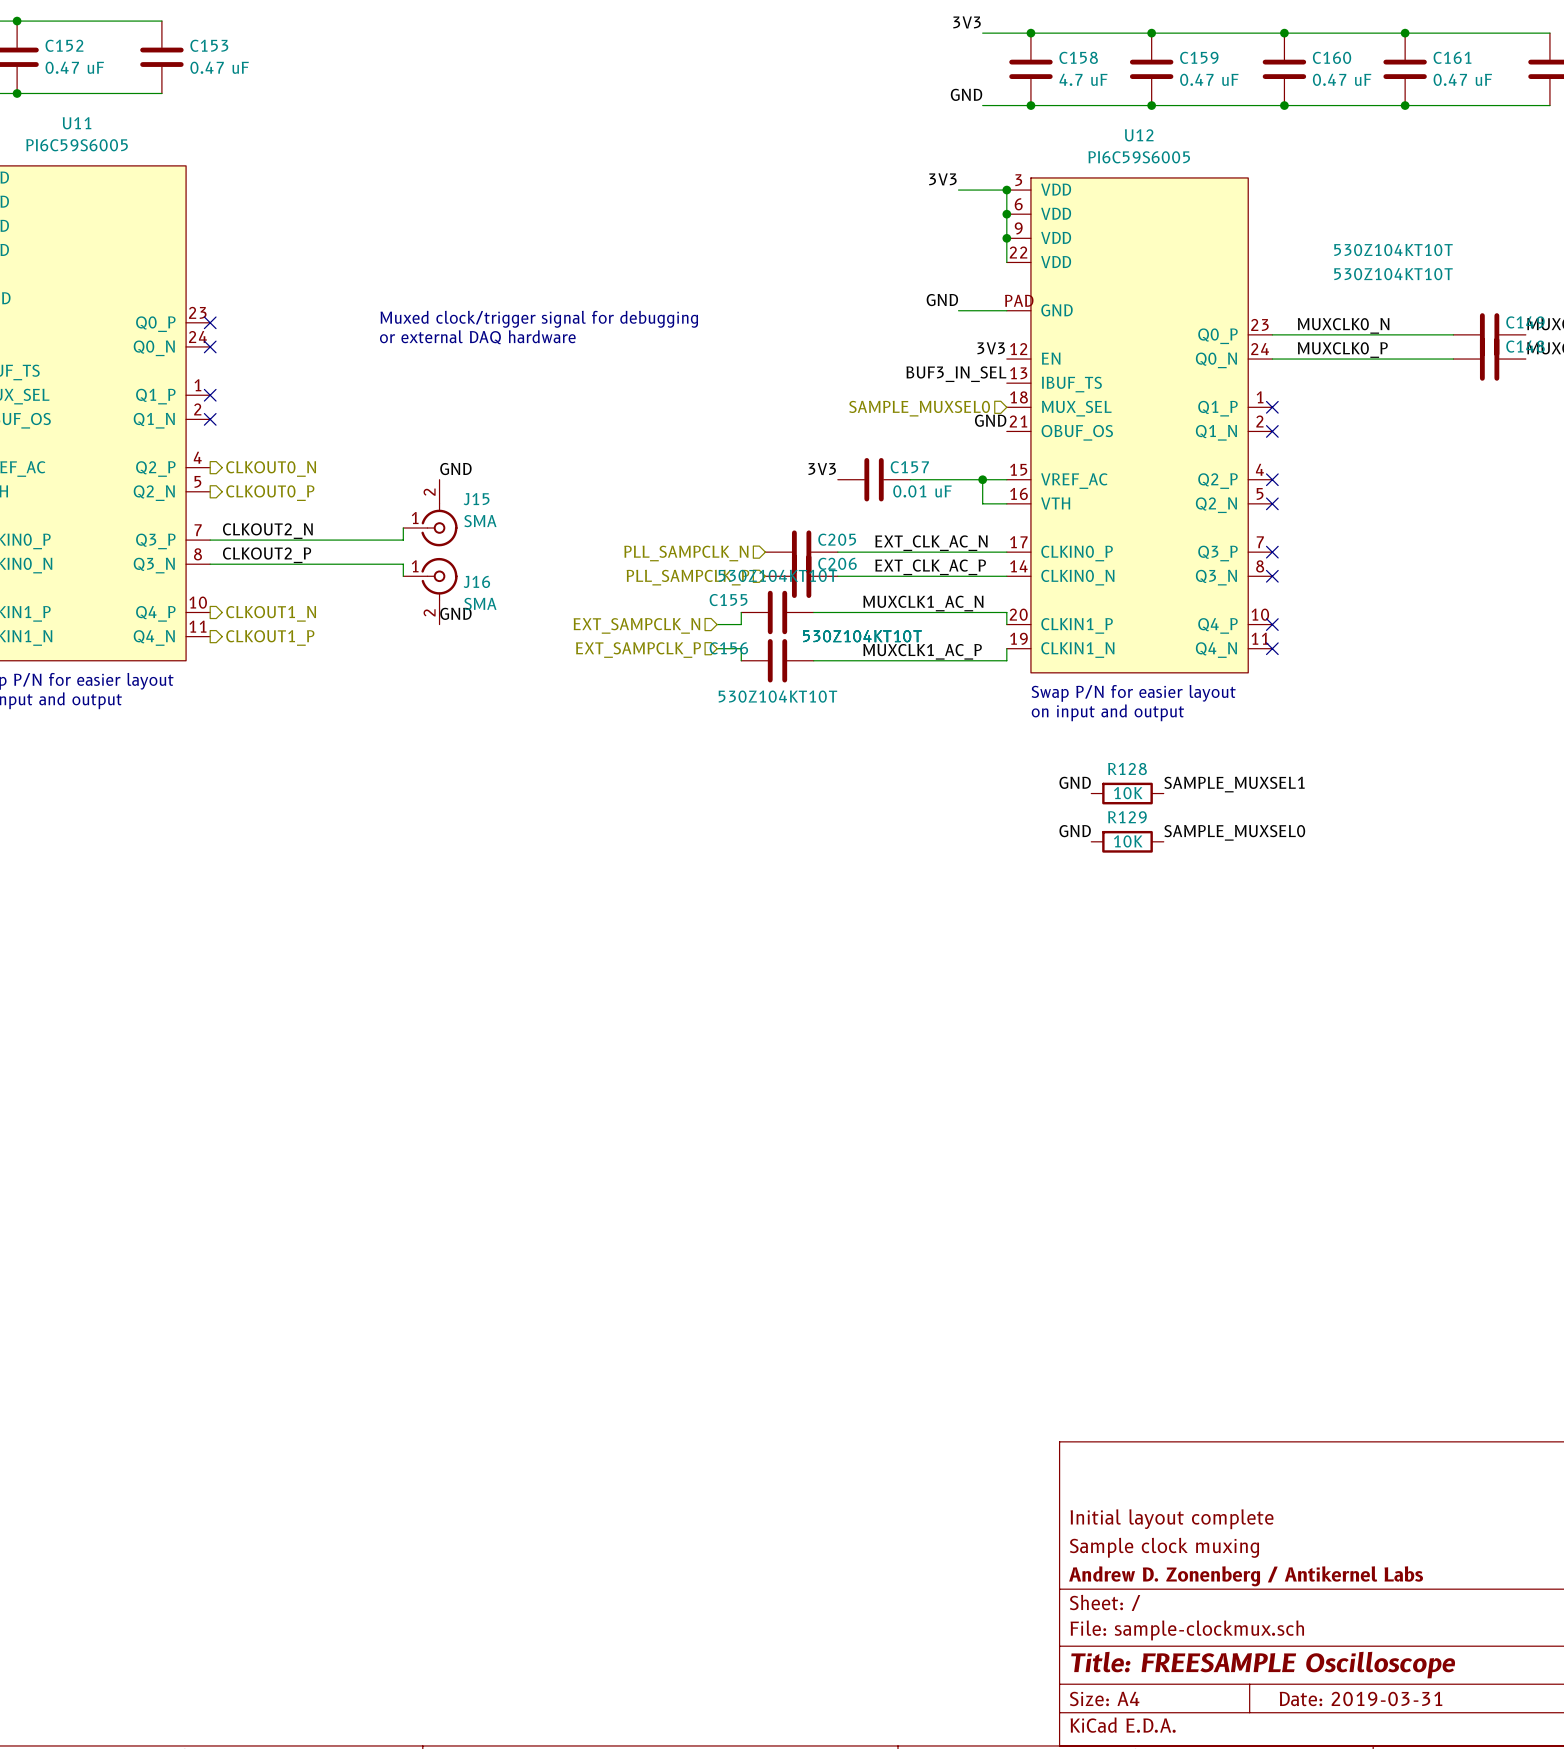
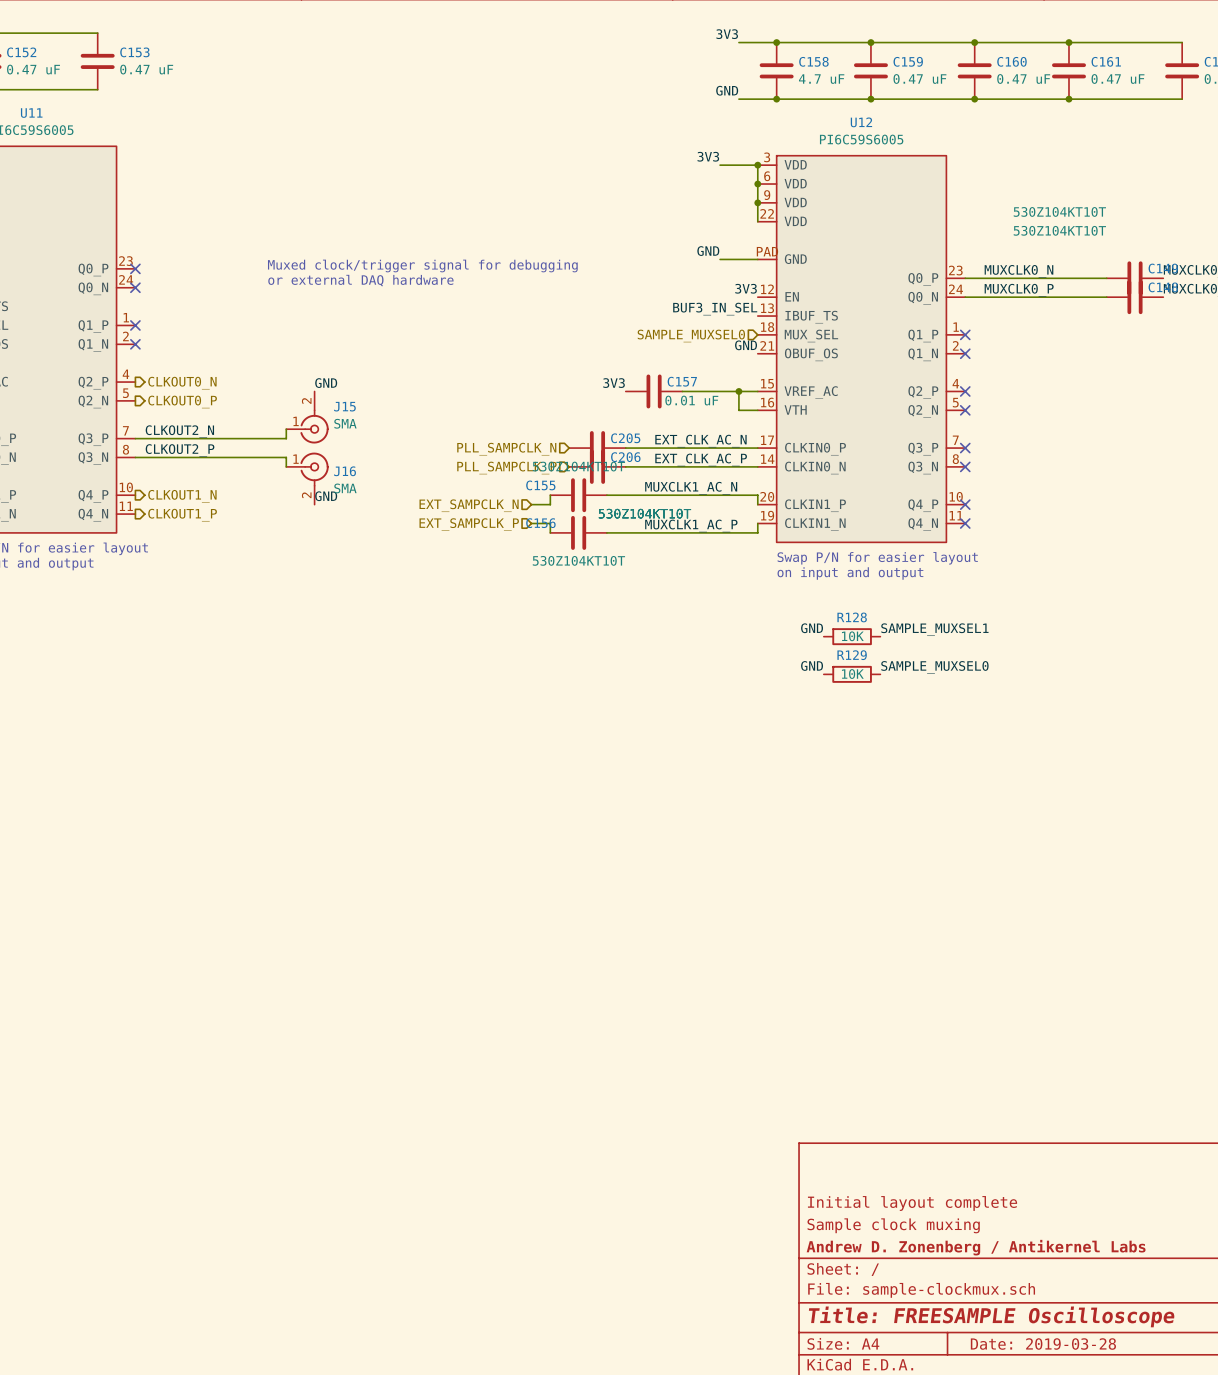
title block: Date: 2019-03-31 (1361, 1698) -> Date: 2019-03-28 (1043, 1344)

